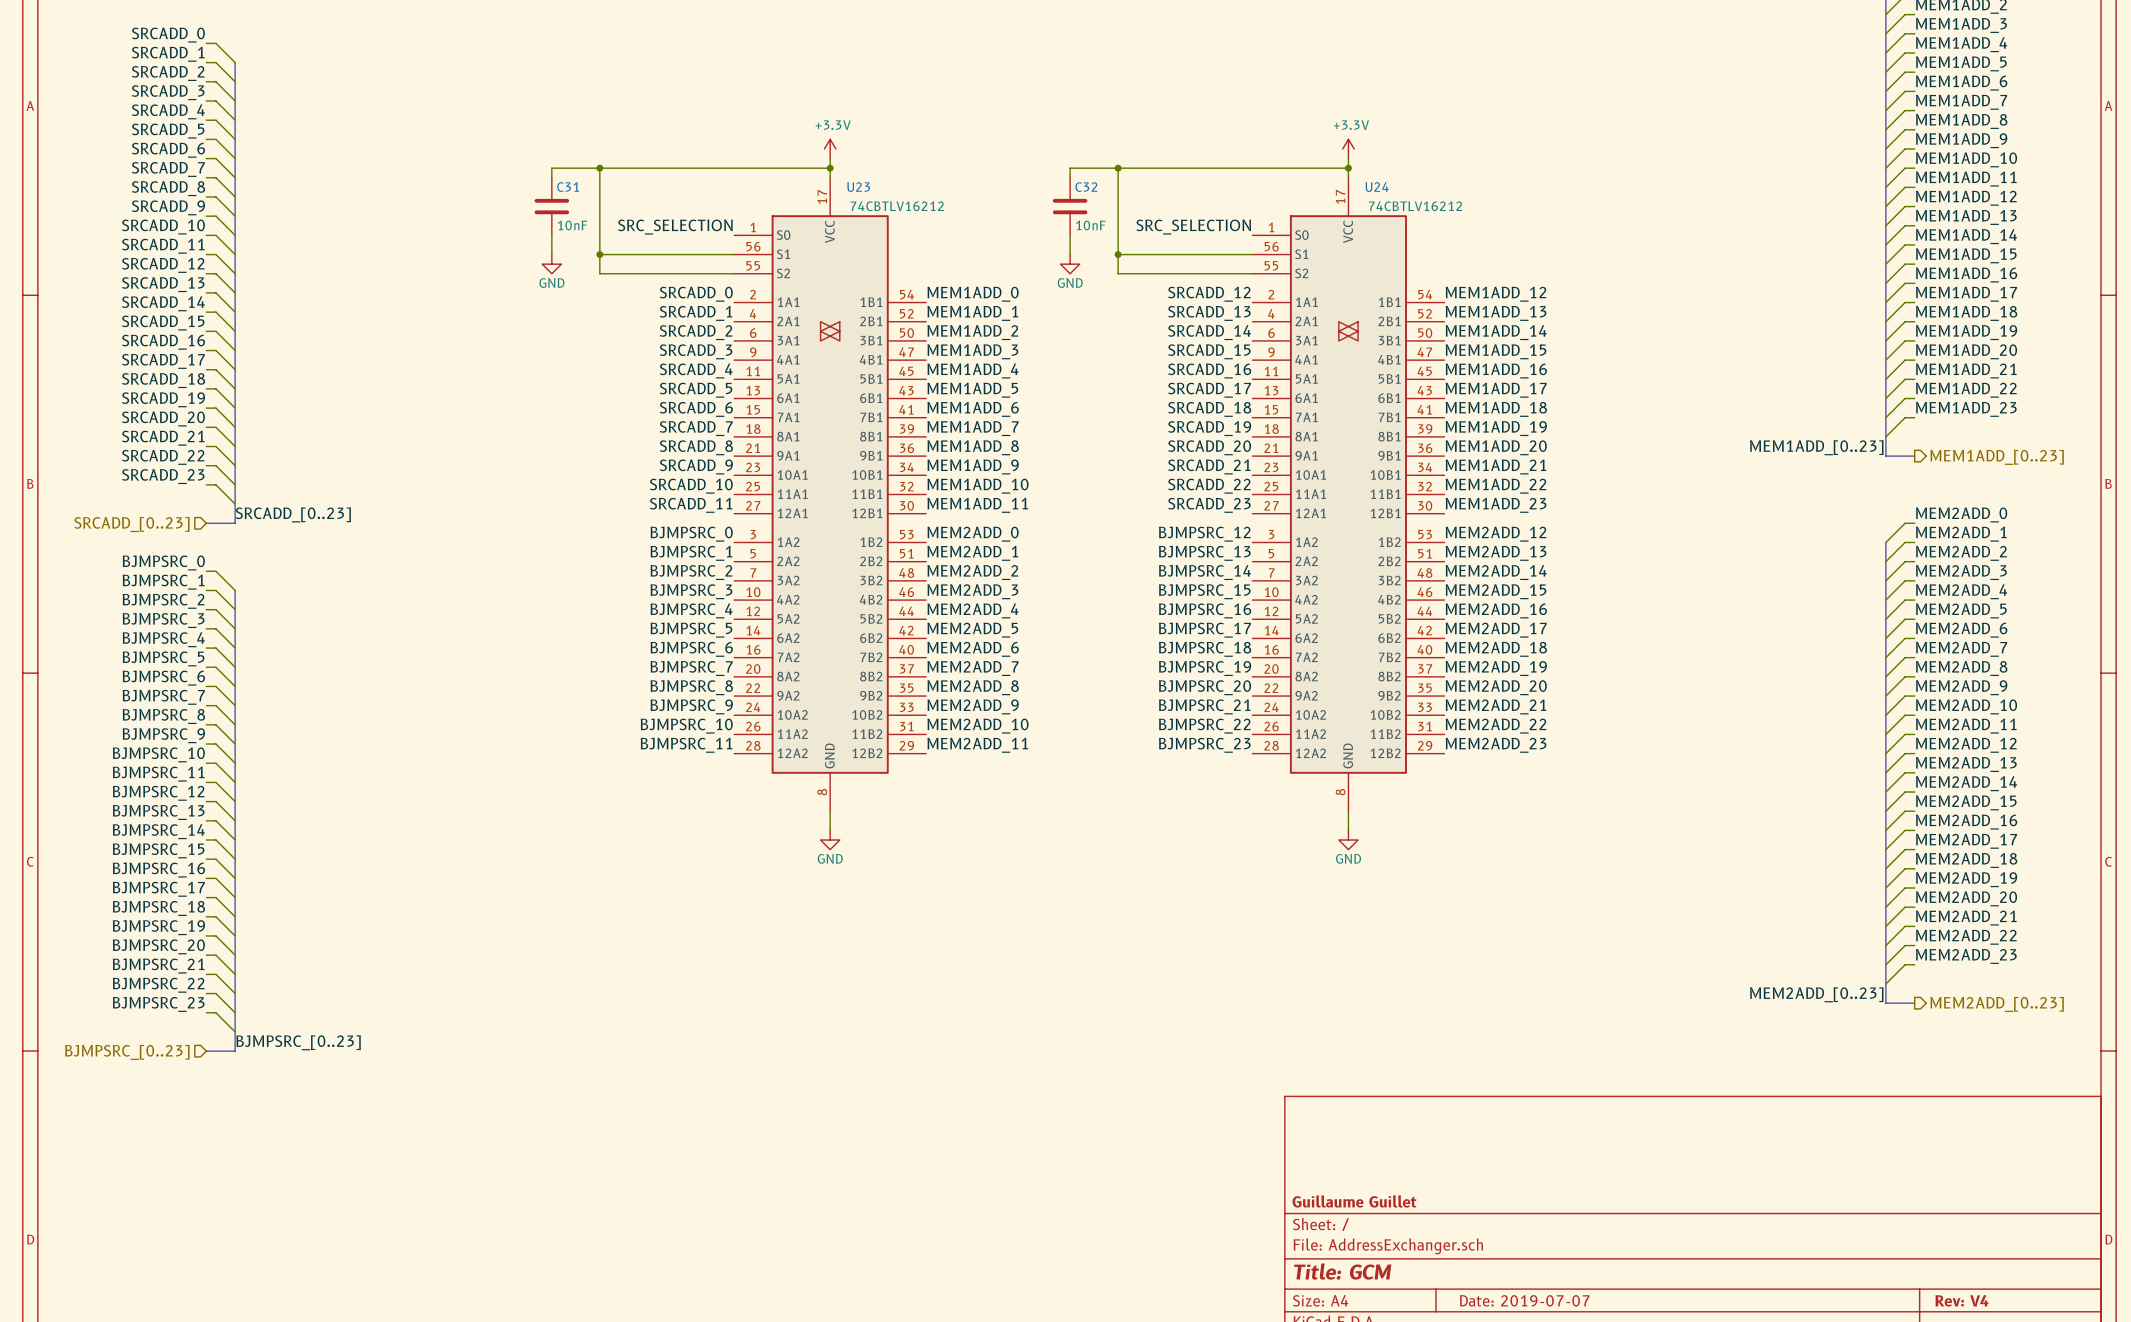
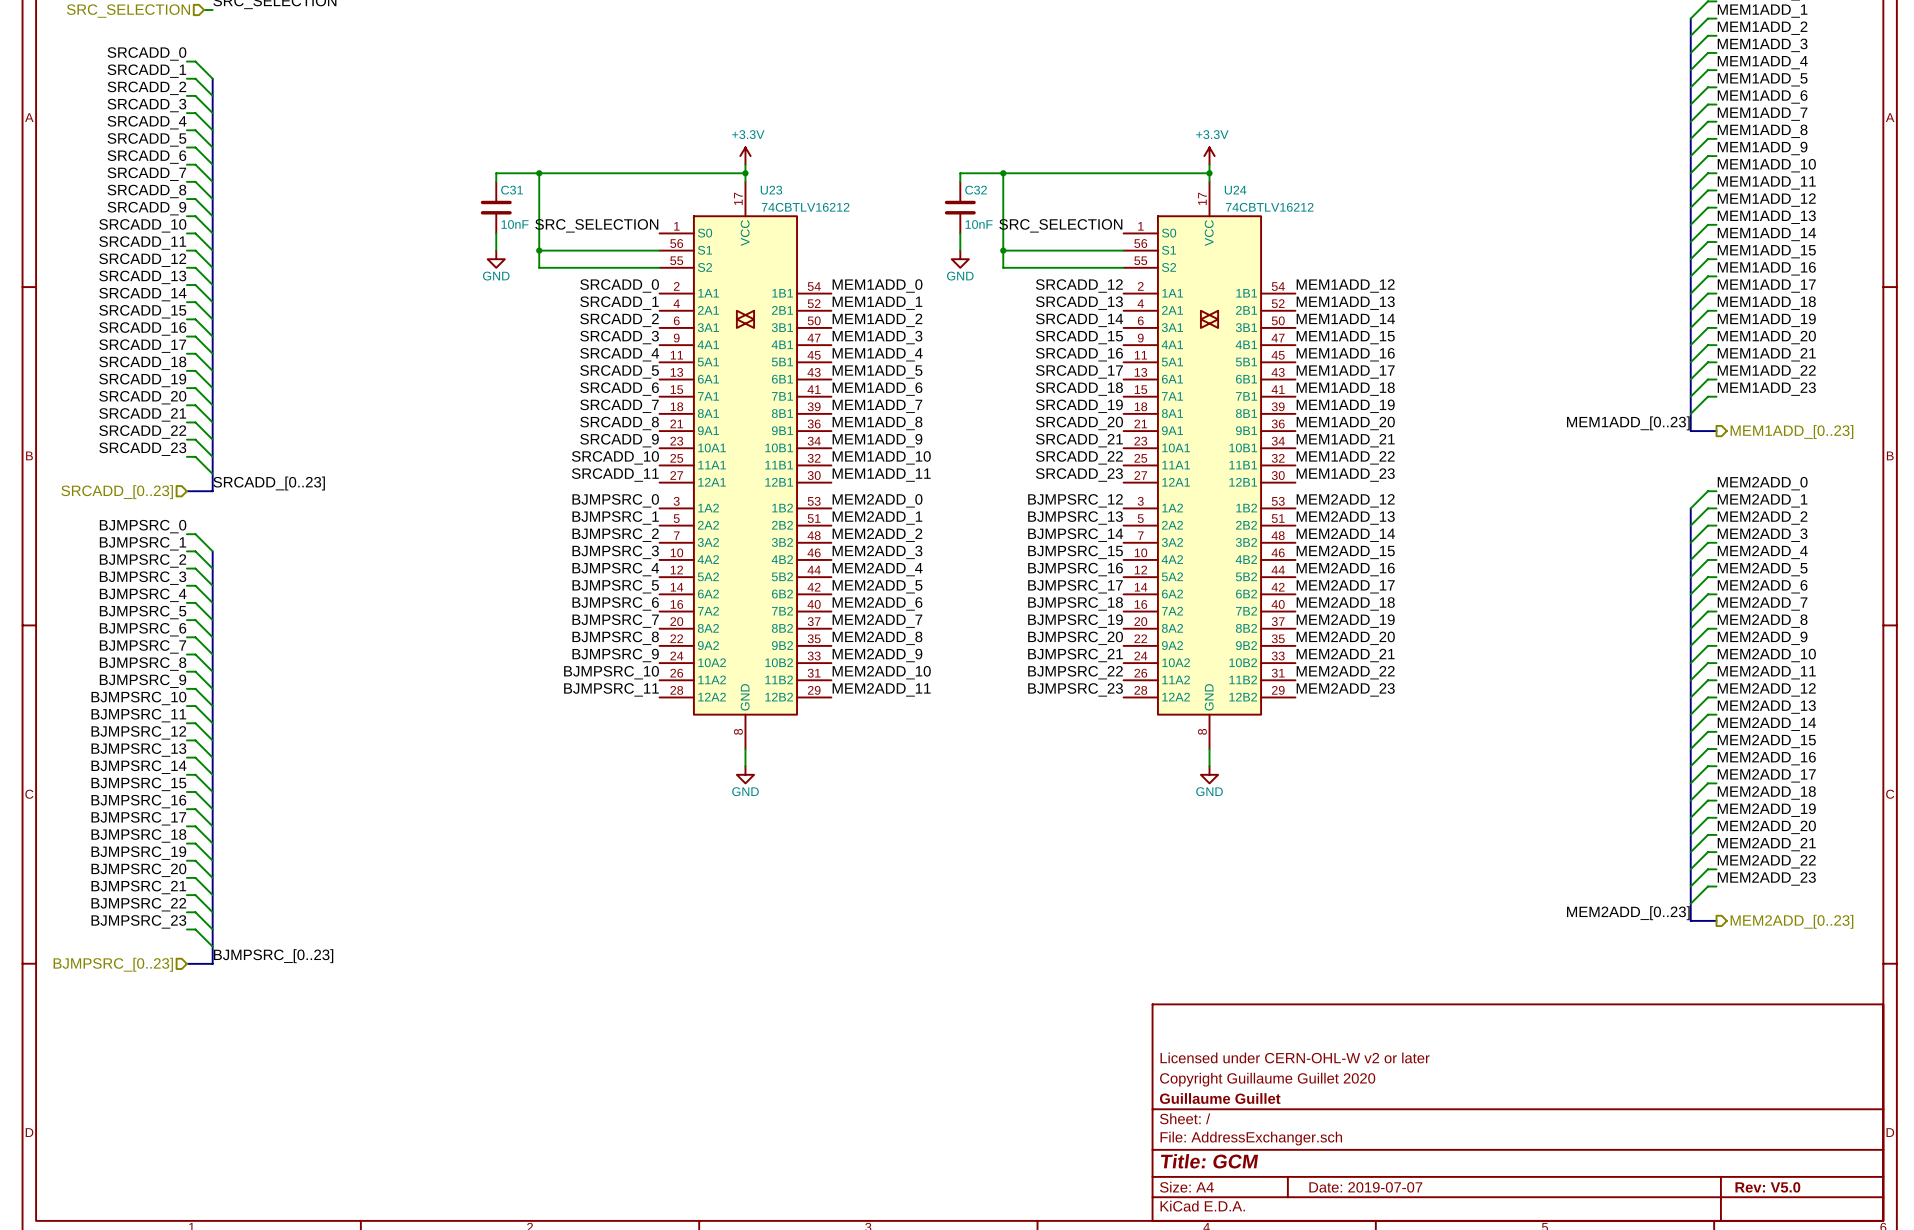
title block: none -> Licensed under CERN-OHL-W v2 or later (1295, 1057)
title block: none -> Copyright Guillaume Guillet 2020 (1267, 1079)
title block: Rev: V4 (1962, 1300) -> Rev: V5.0 (1767, 1187)

